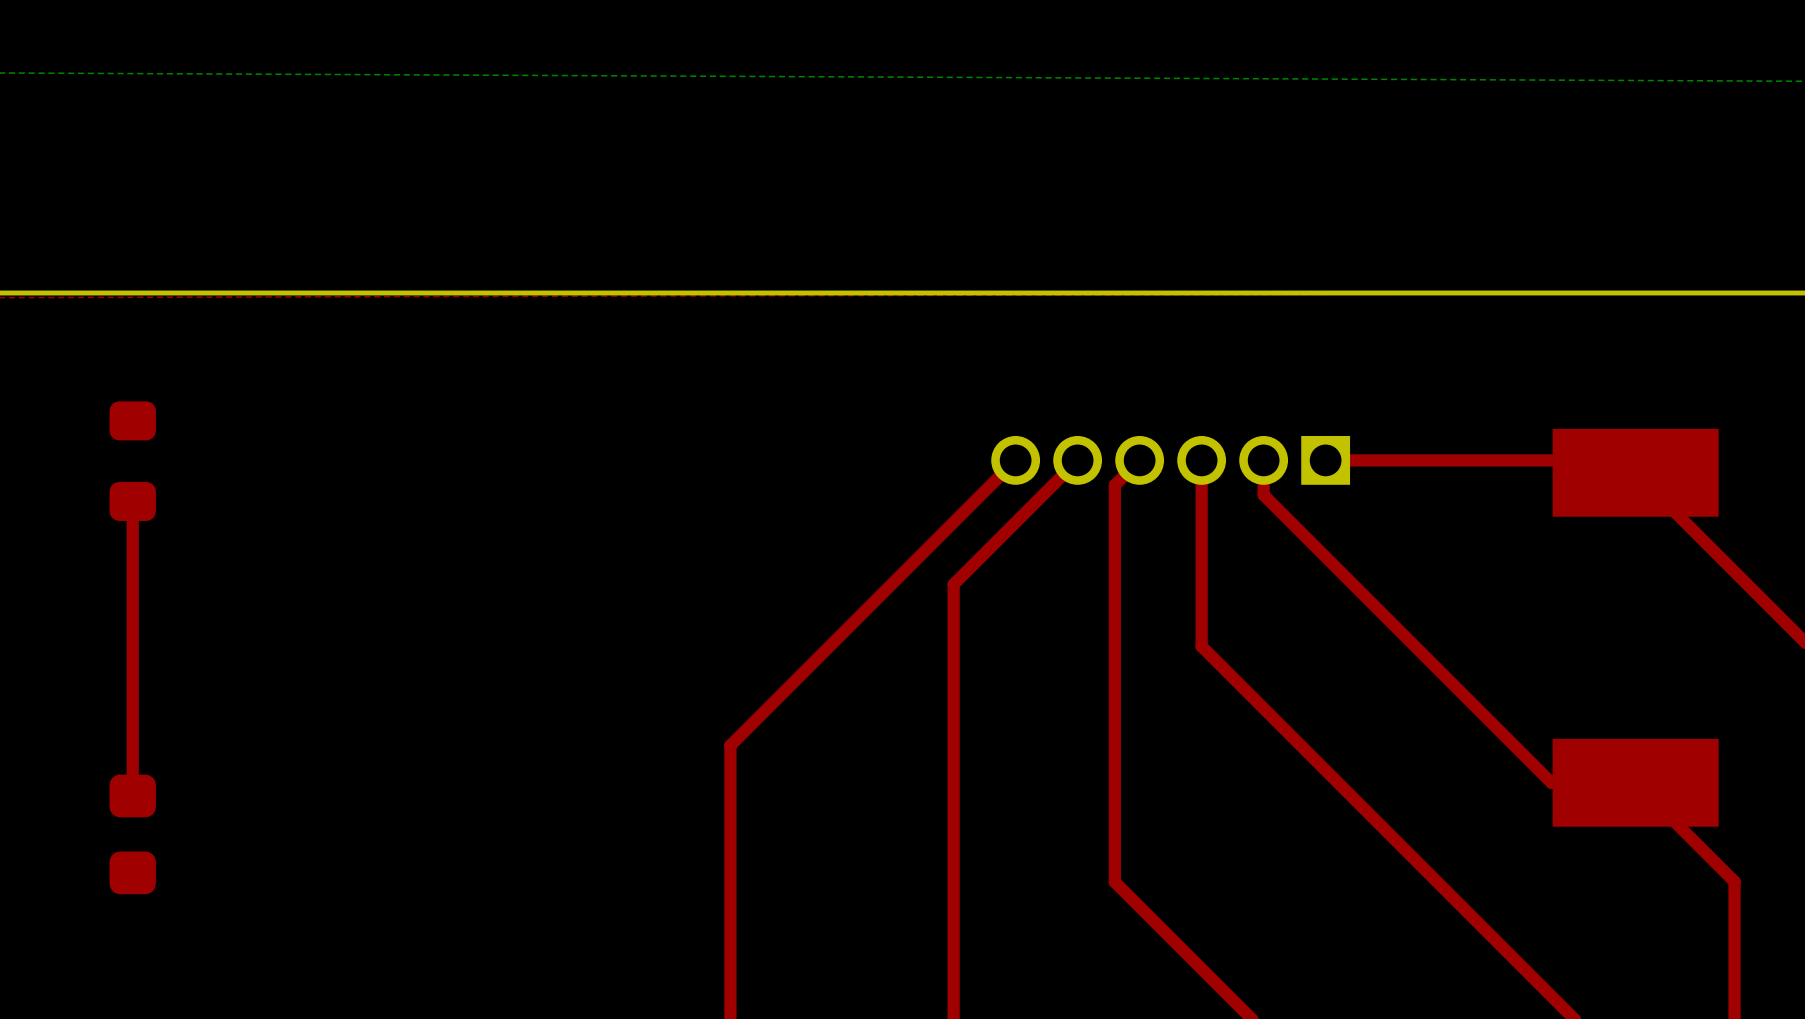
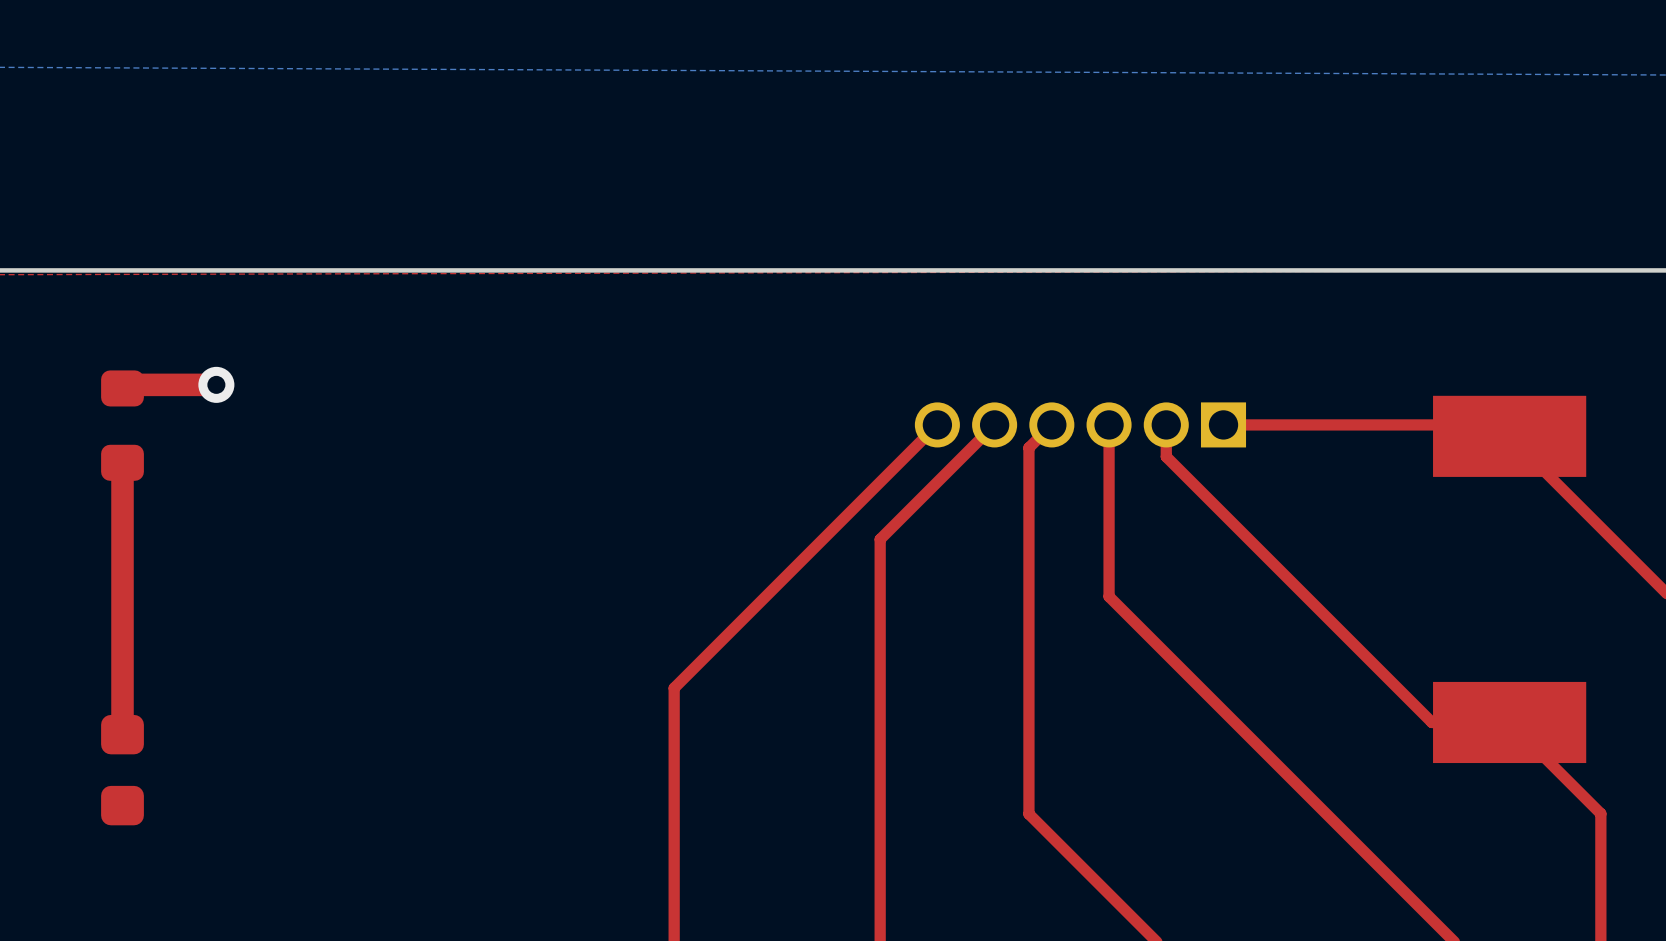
top track: none -> (216, 384) (126, 384) (122, 388)
via: none -> (216, 384)
top track width: thin (132, 501) (132, 795) -> thick (122, 462) (122, 734)

